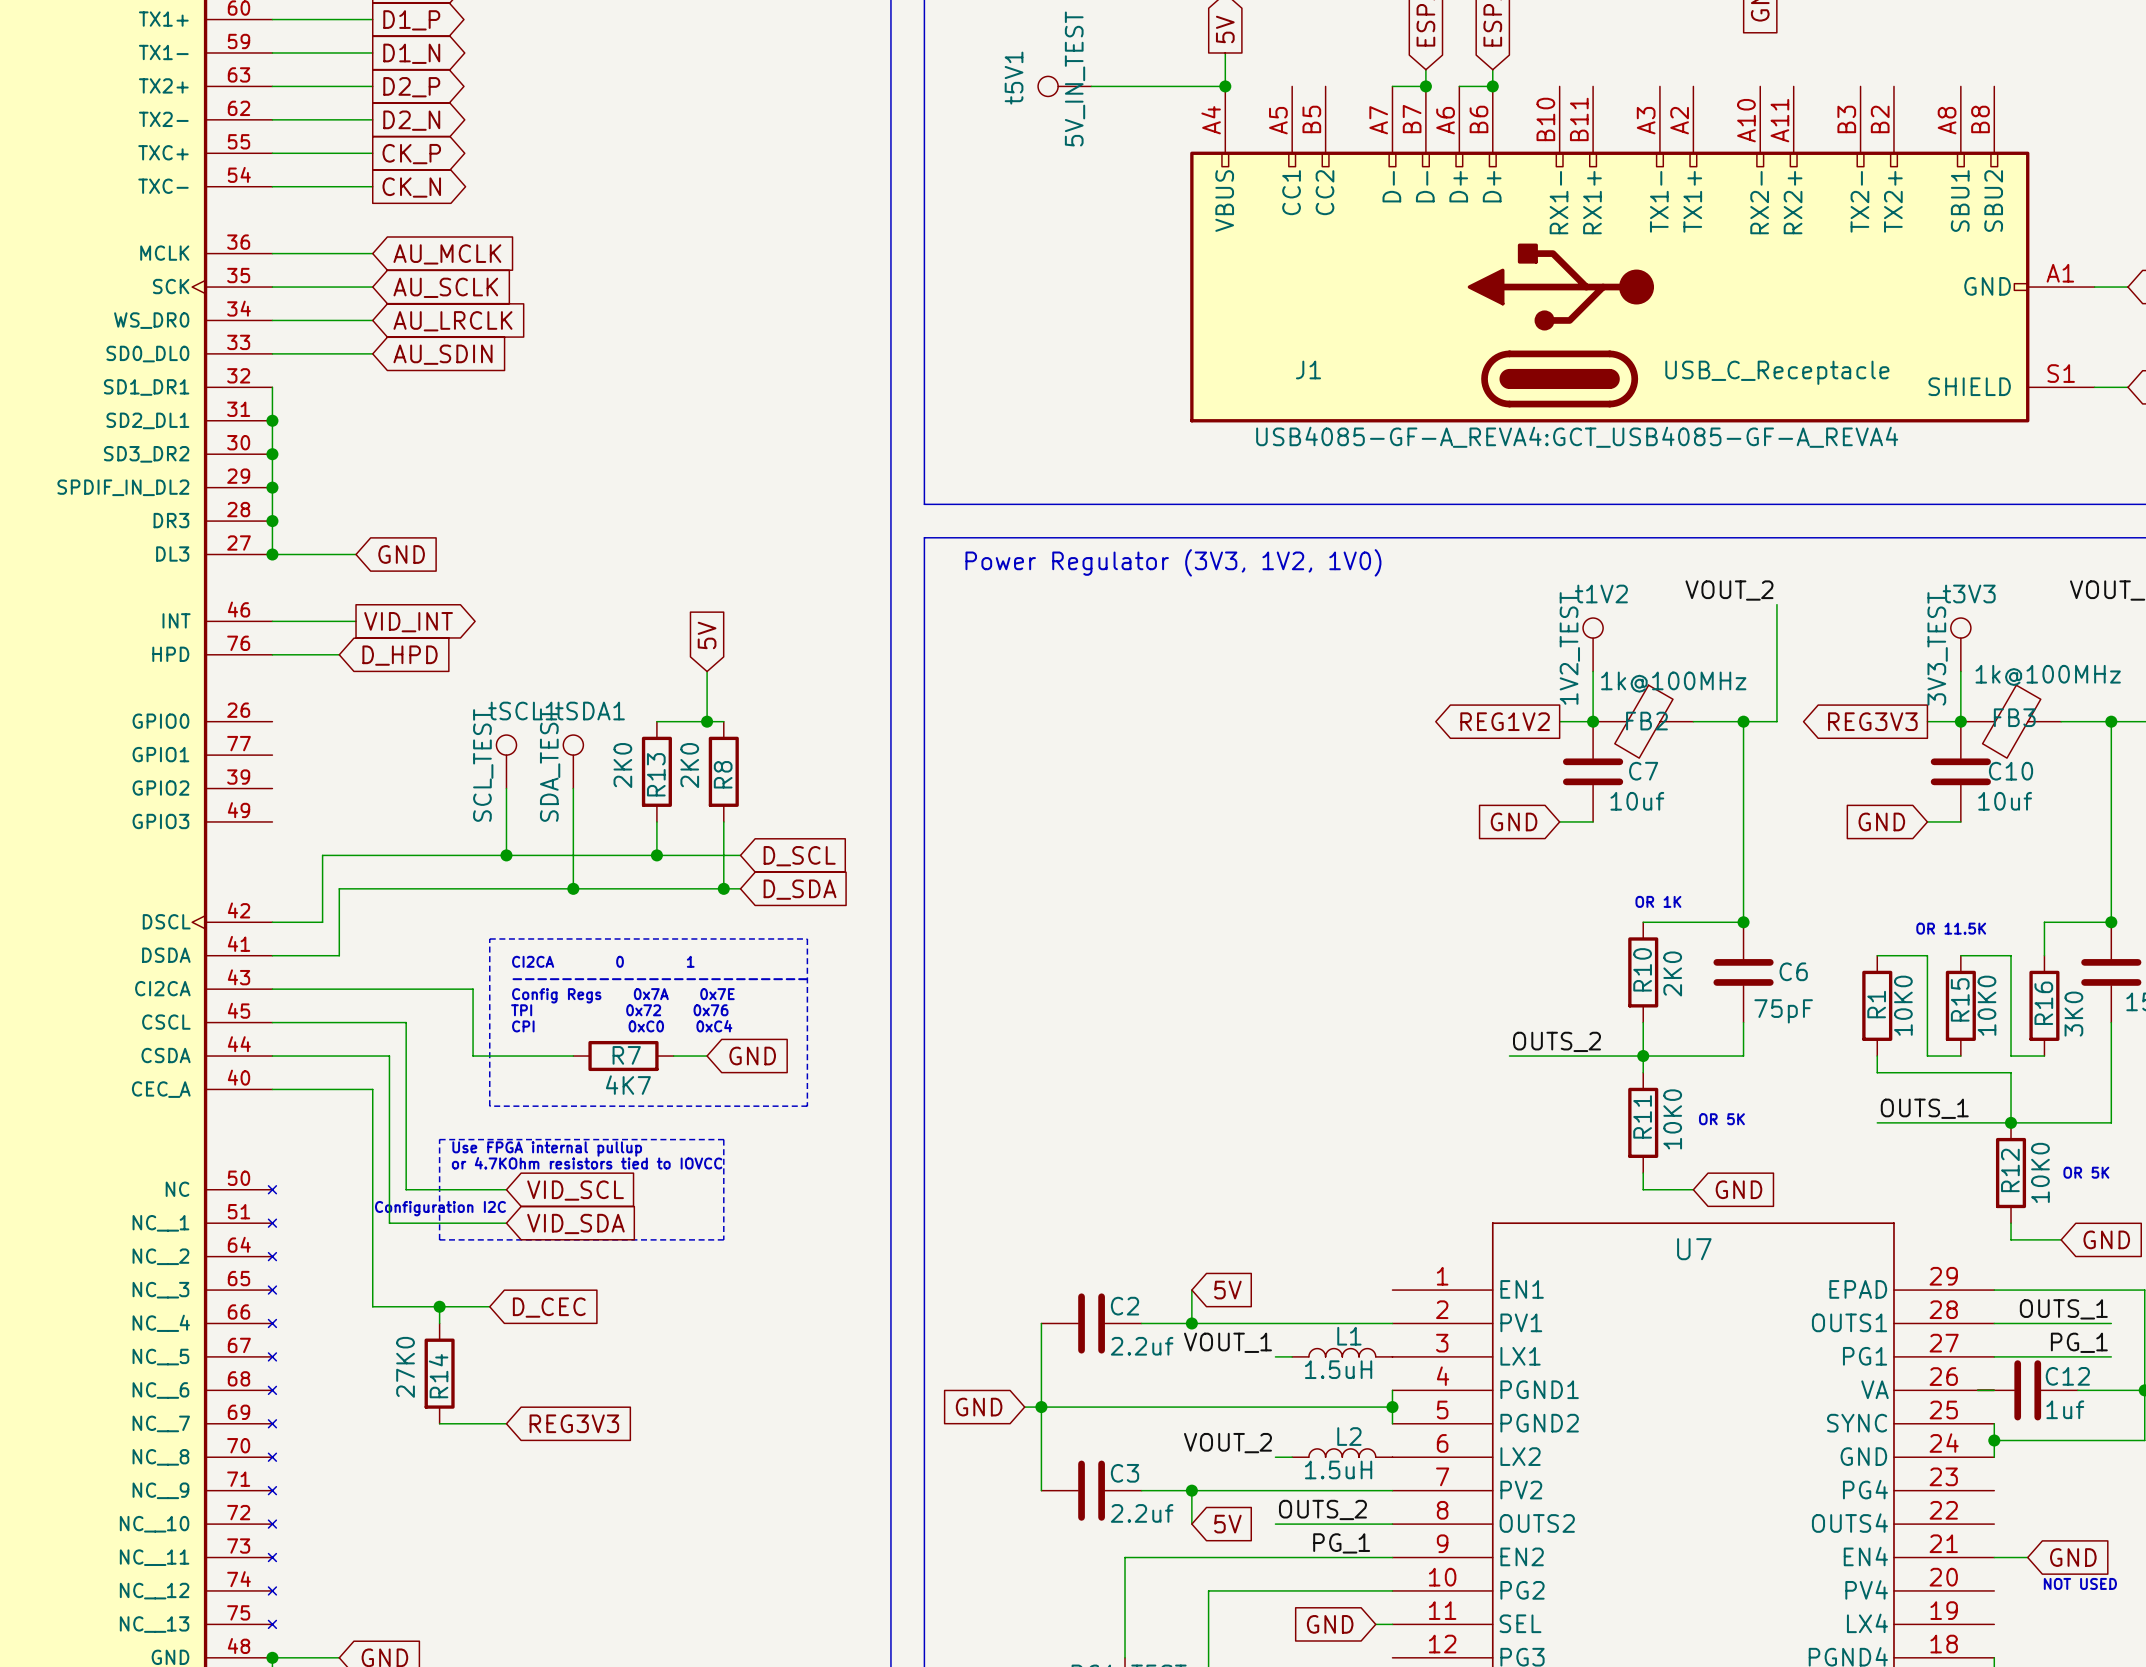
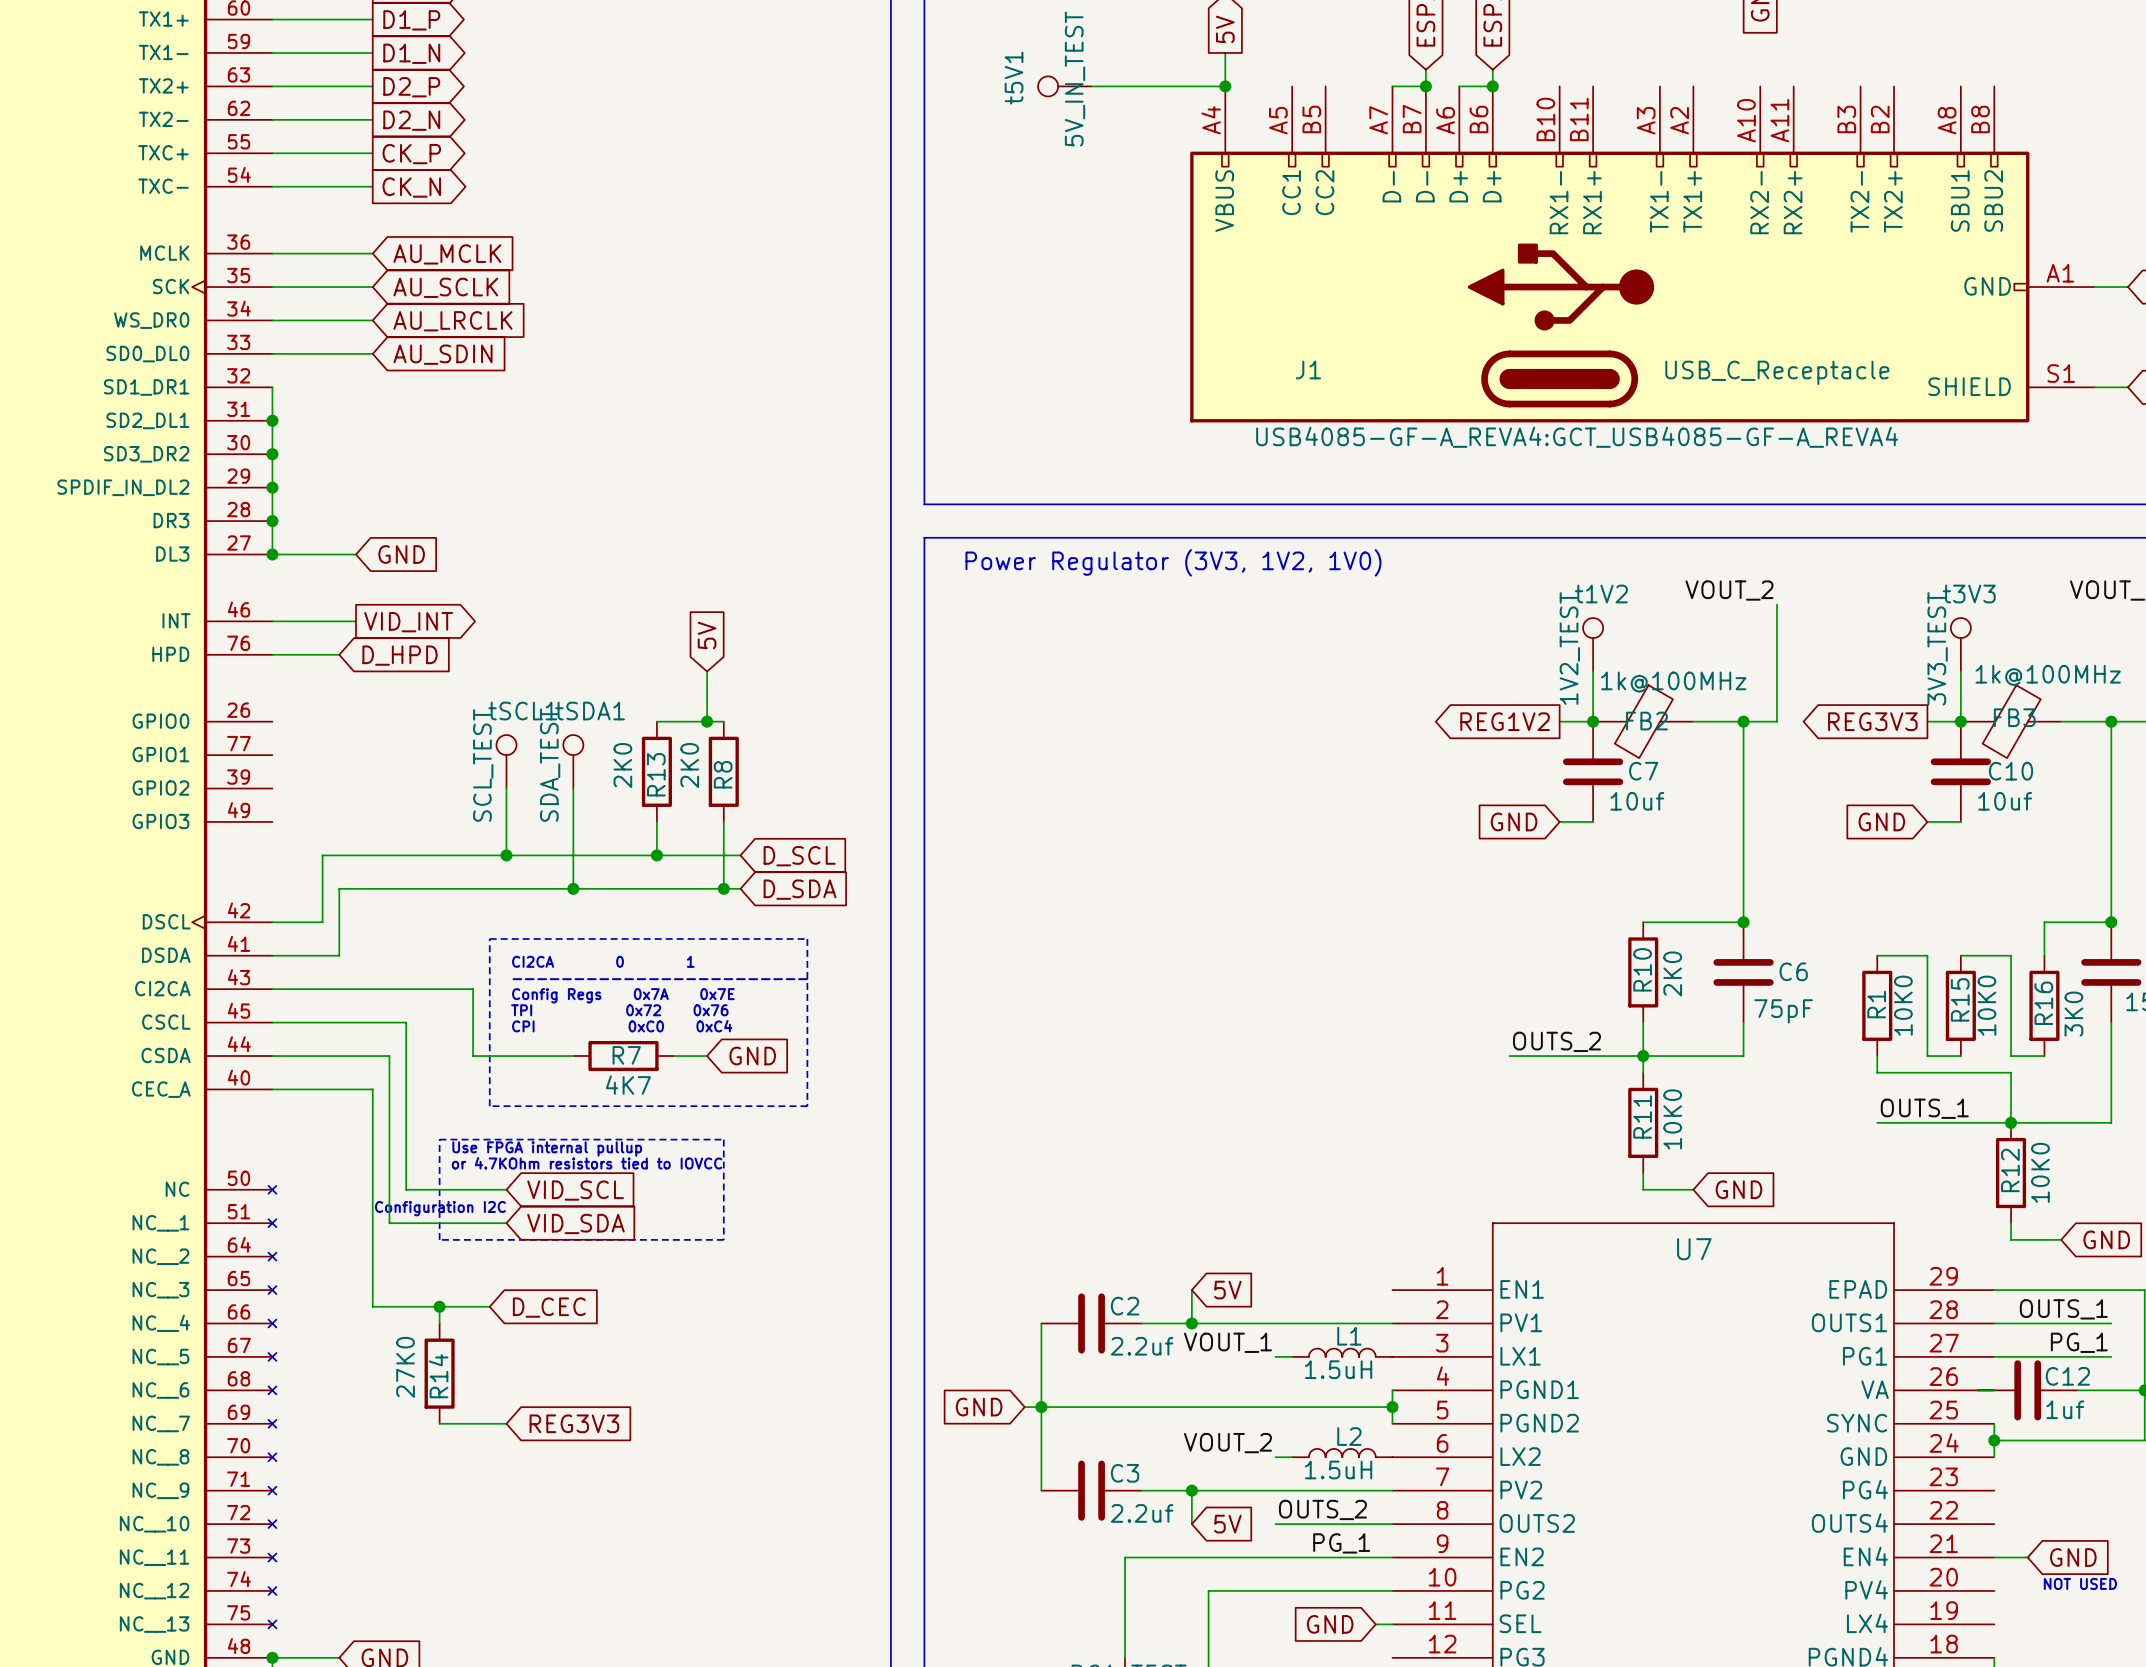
text: OR 1K (1658, 901) -> none
text: OR 11.5K (1951, 928) -> none
text: OR 5K (1721, 1119) -> none
text: OR 5K (2086, 1172) -> none

